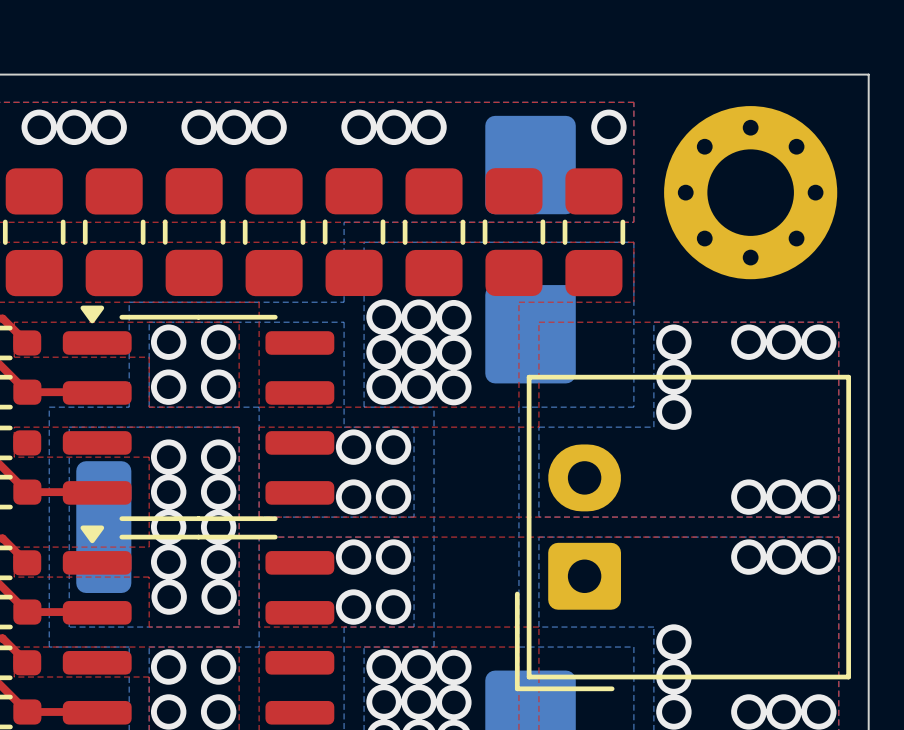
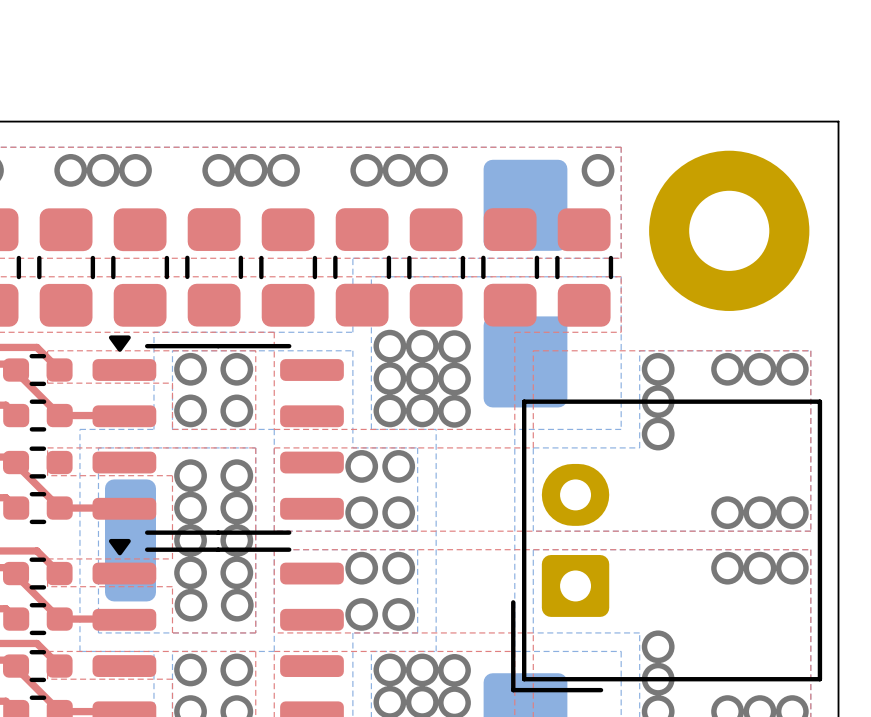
part footprint: [664, 106, 838, 280] -> [649, 150, 810, 311]

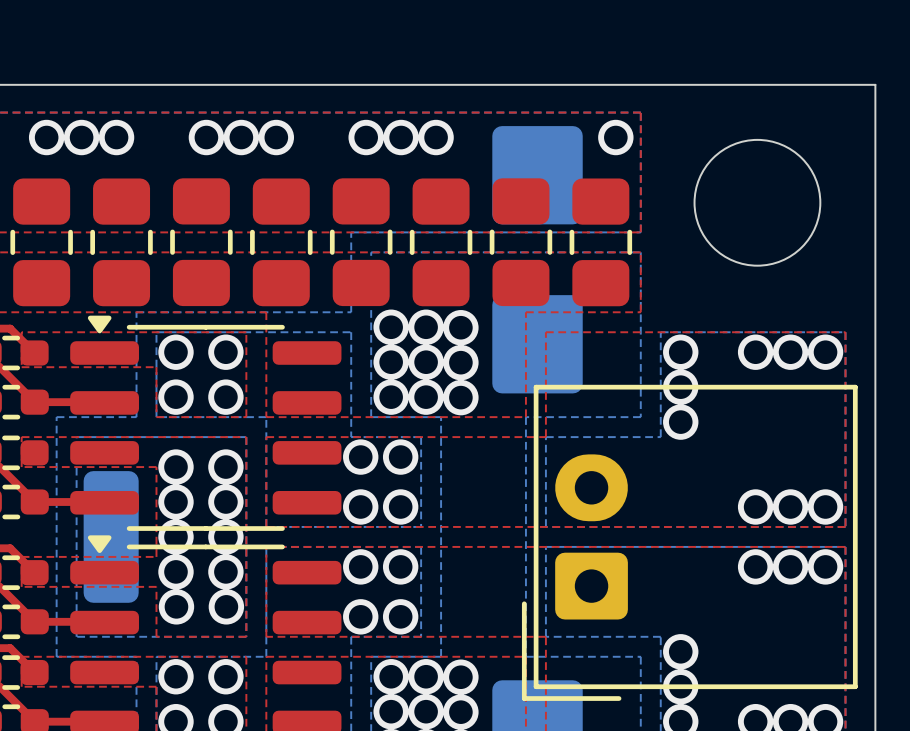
round board edge: none -> [693, 138, 822, 267]
part: (729, 230) -> none

